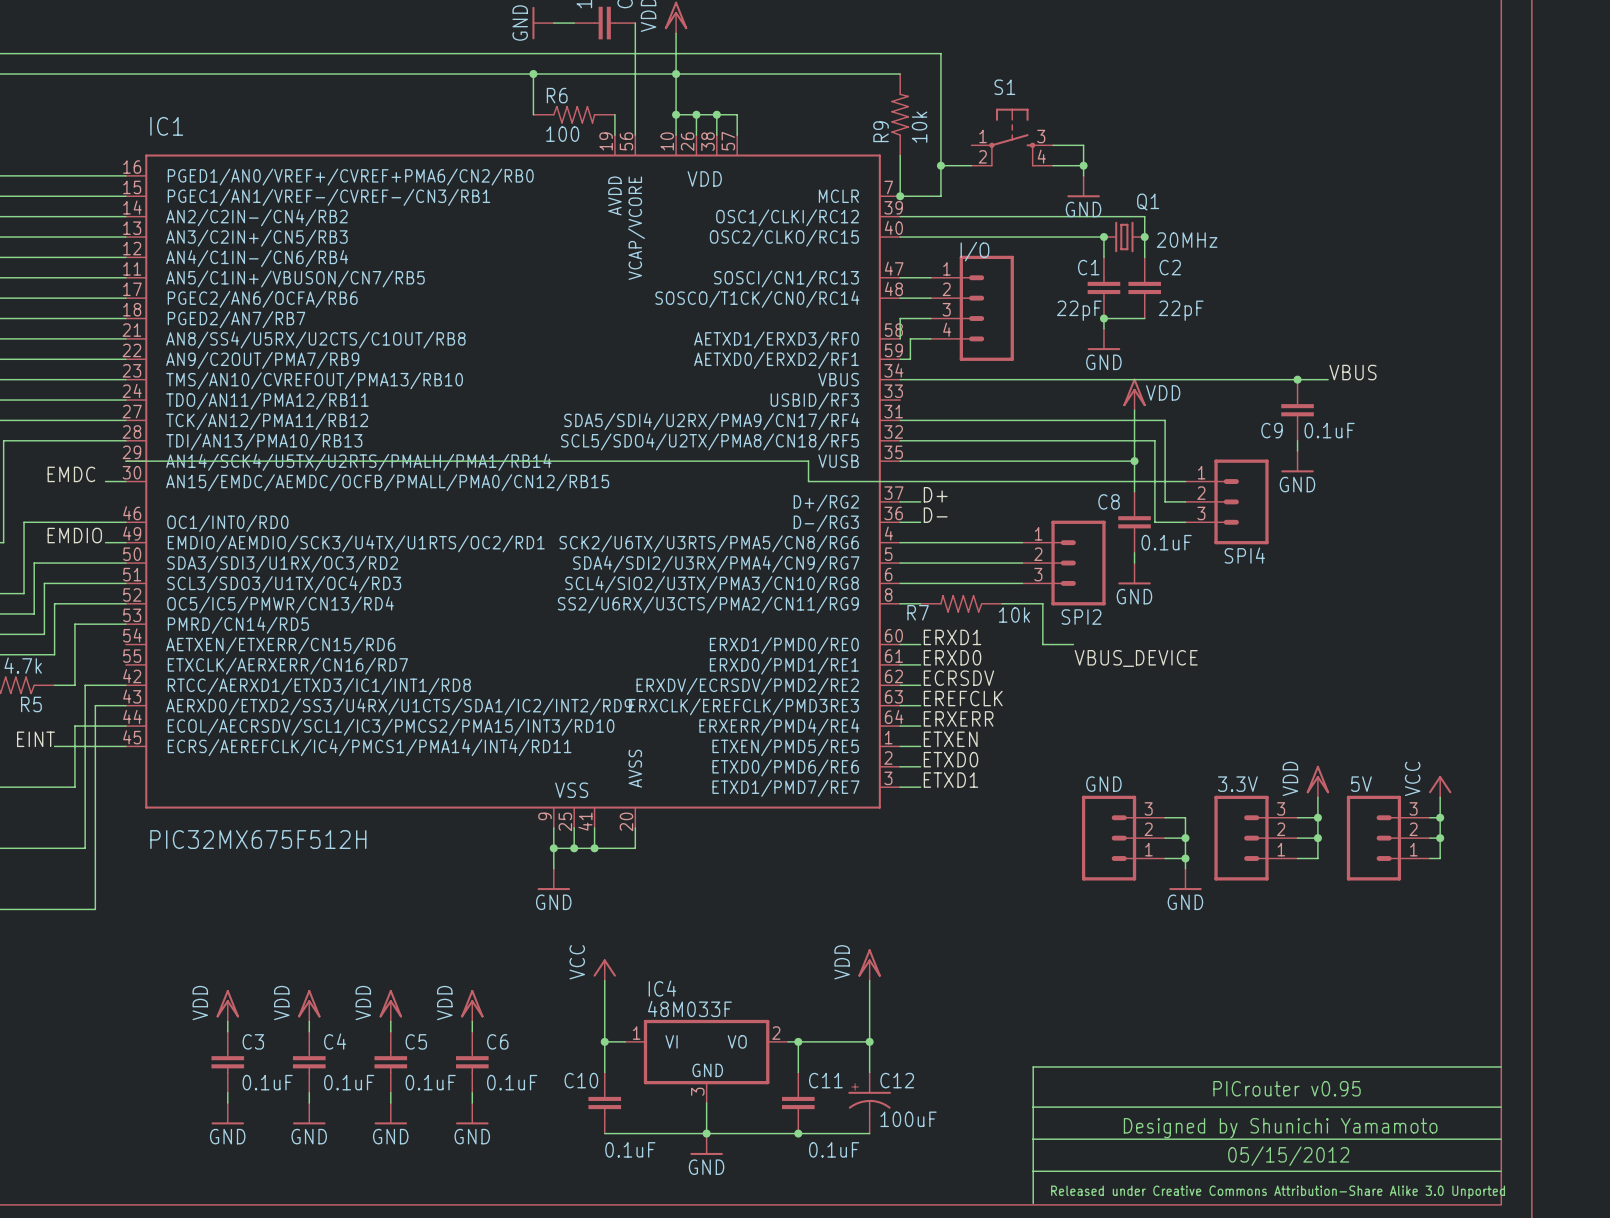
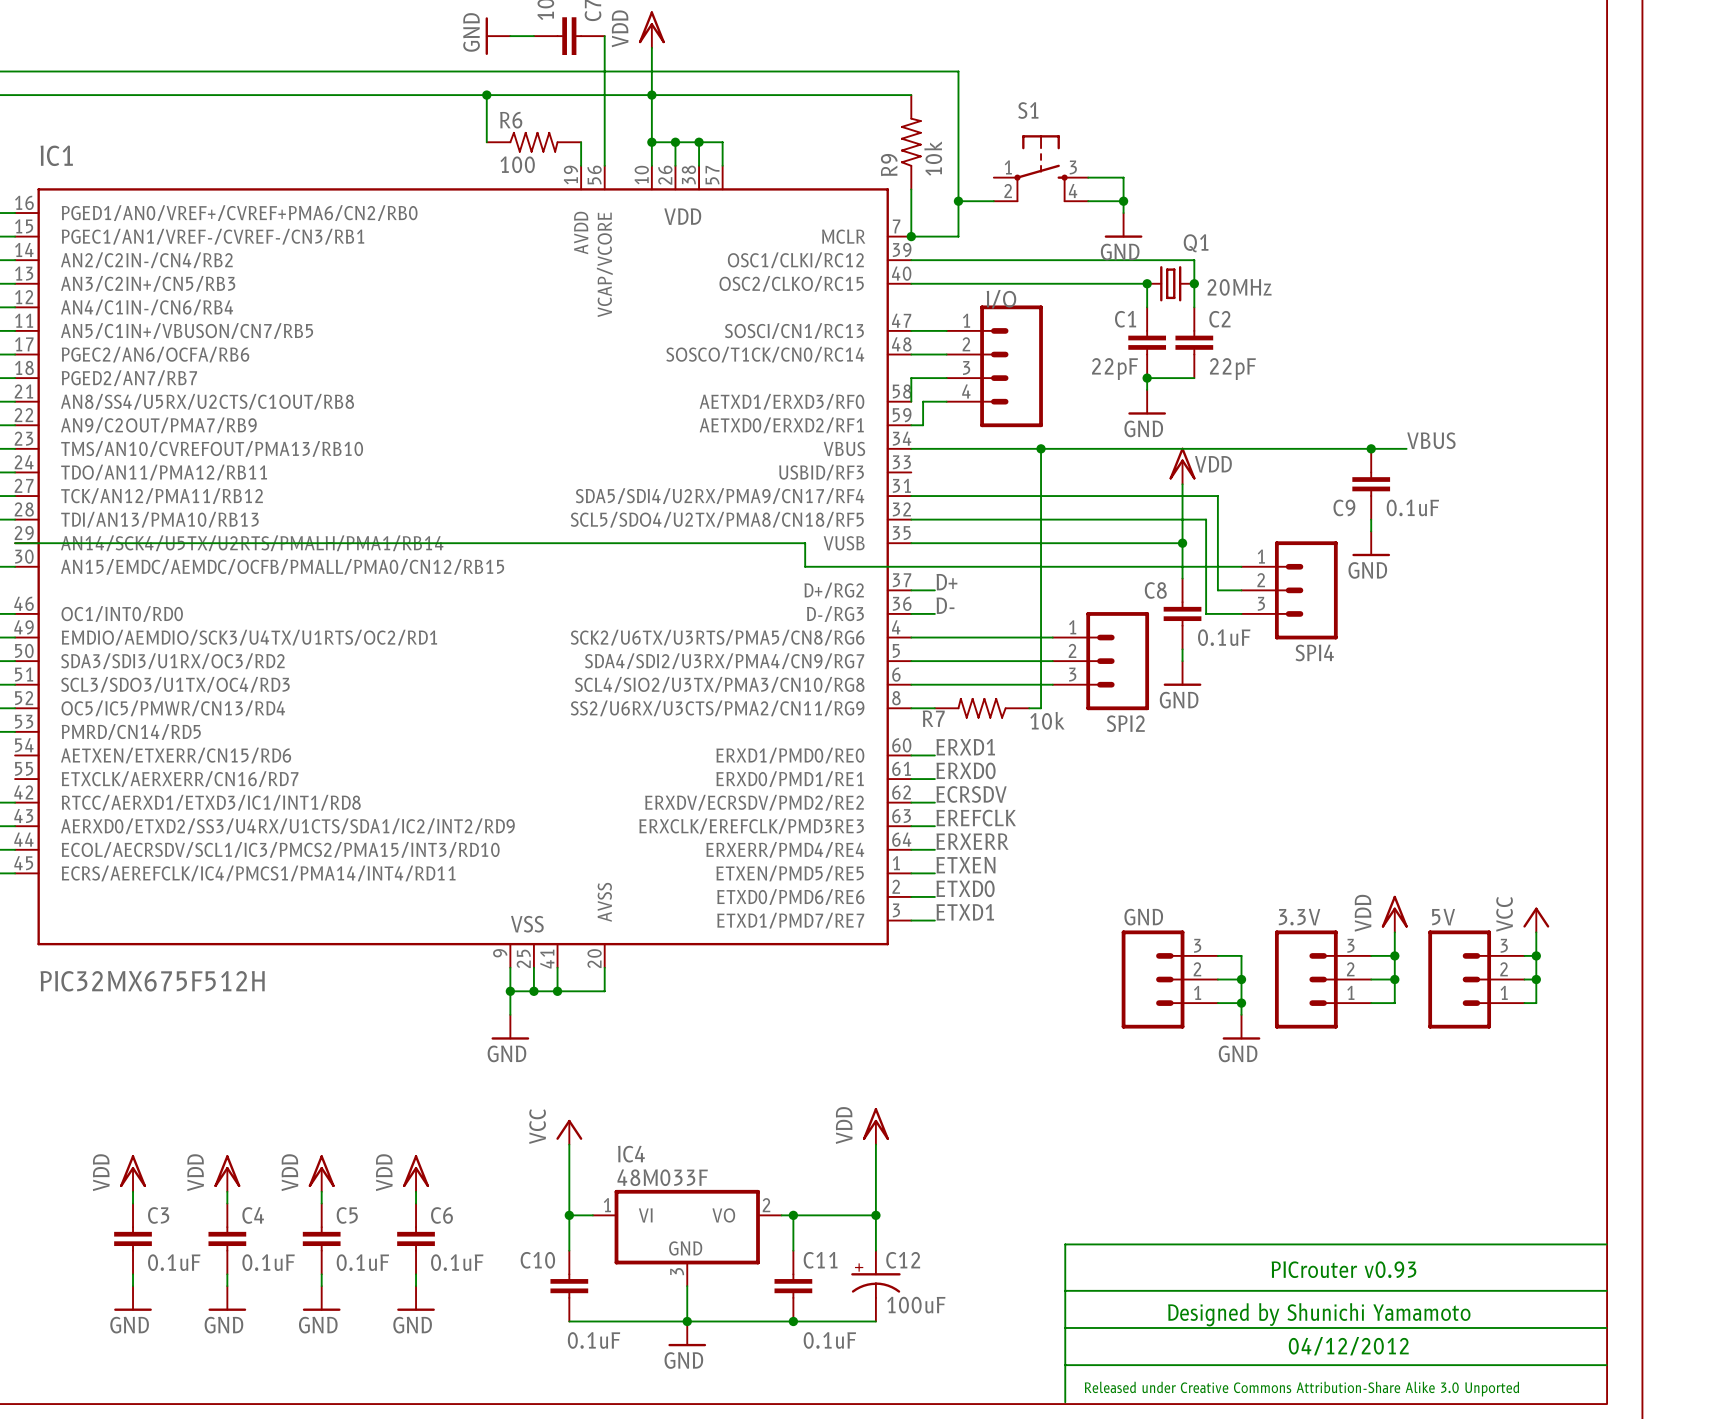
junction: none -> (1041, 448)
wire: (1012, 603) (1042, 603) (1042, 644) (1073, 644) -> (1041, 708) (1041, 448)
label: VBUS_DEVICE (1136, 658) -> none
text: PICrouter v0.95 (1287, 1088) -> PICrouter v0.93 (1343, 1269)
text: 05/15/2012 (1288, 1156) -> 04/12/2012 (1348, 1346)

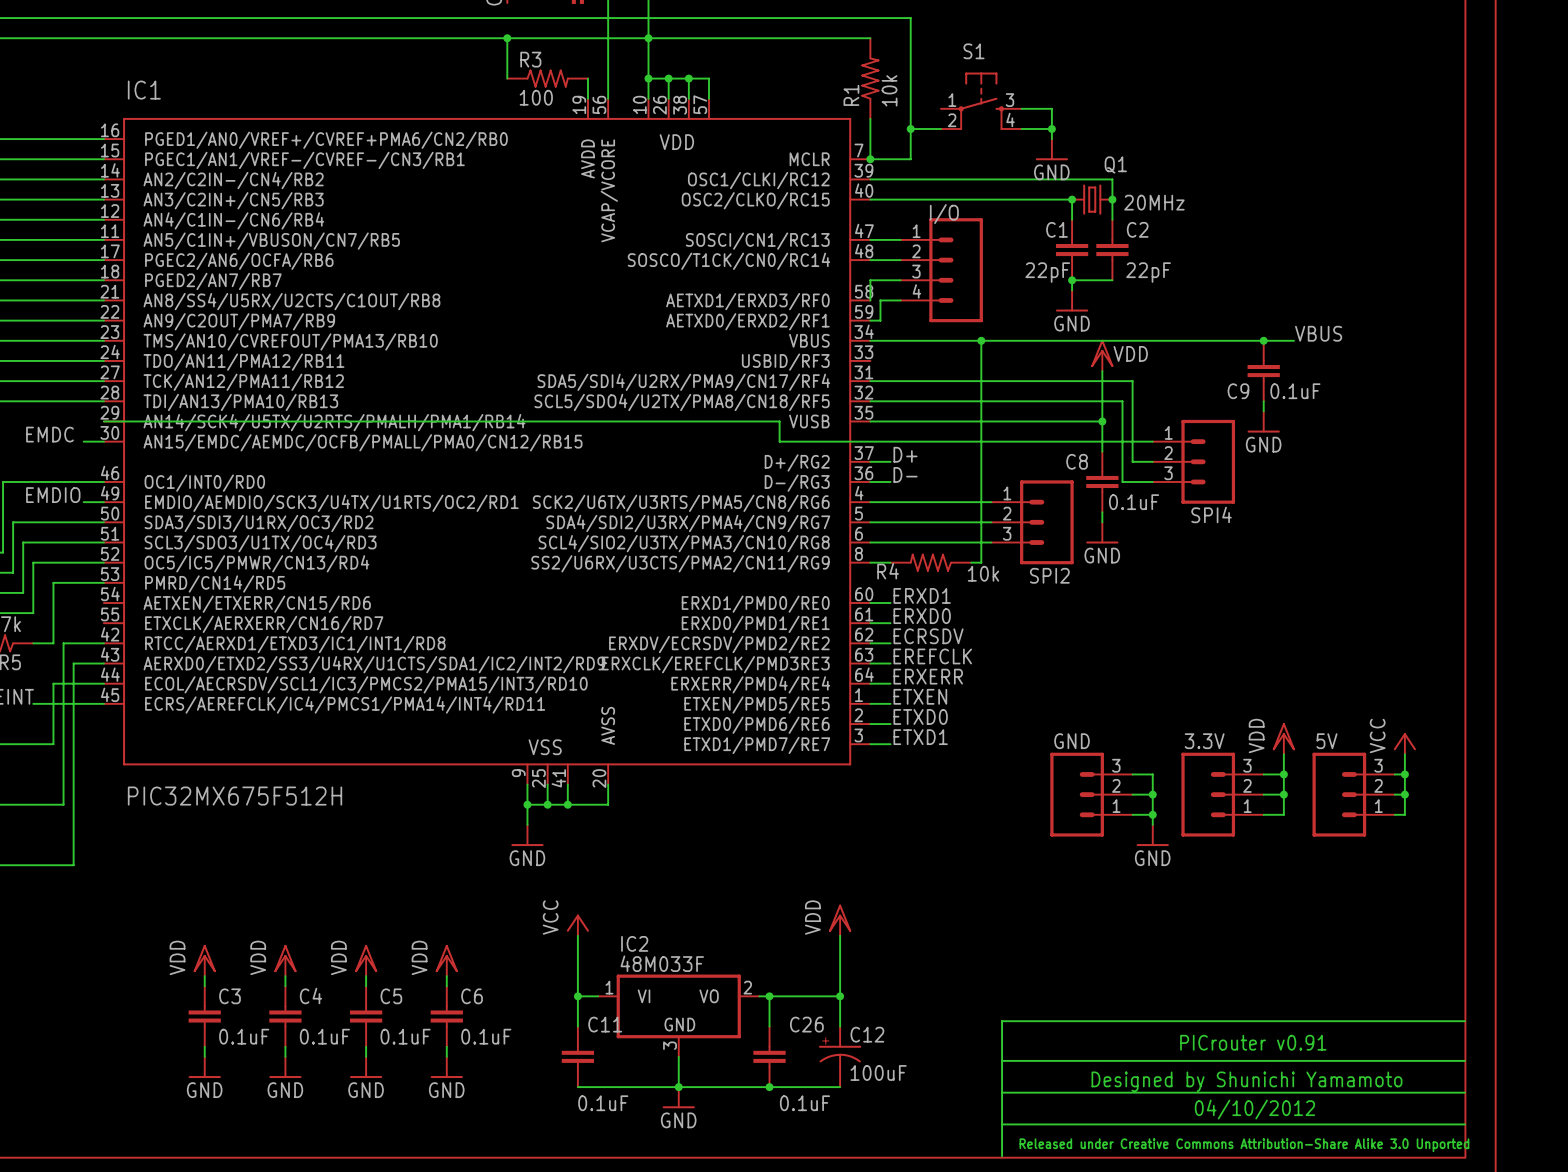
R6 name: R6 (511, 120) -> R3 (530, 59)
R9 name: R9 (889, 165) -> R1 (851, 95)
R7 name: R7 (933, 718) -> R4 (888, 571)
IC4 name: IC4 (631, 1154) -> IC2 (634, 943)
C10 name: C10 (537, 1260) -> C11 (605, 1024)
C11 name: C11 (820, 1260) -> C26 (806, 1024)
text: PICrouter v0.93 (1343, 1269) -> PICrouter v0.91 (1253, 1042)
text: 04/12/2012 (1348, 1346) -> 04/10/2012 (1254, 1109)

